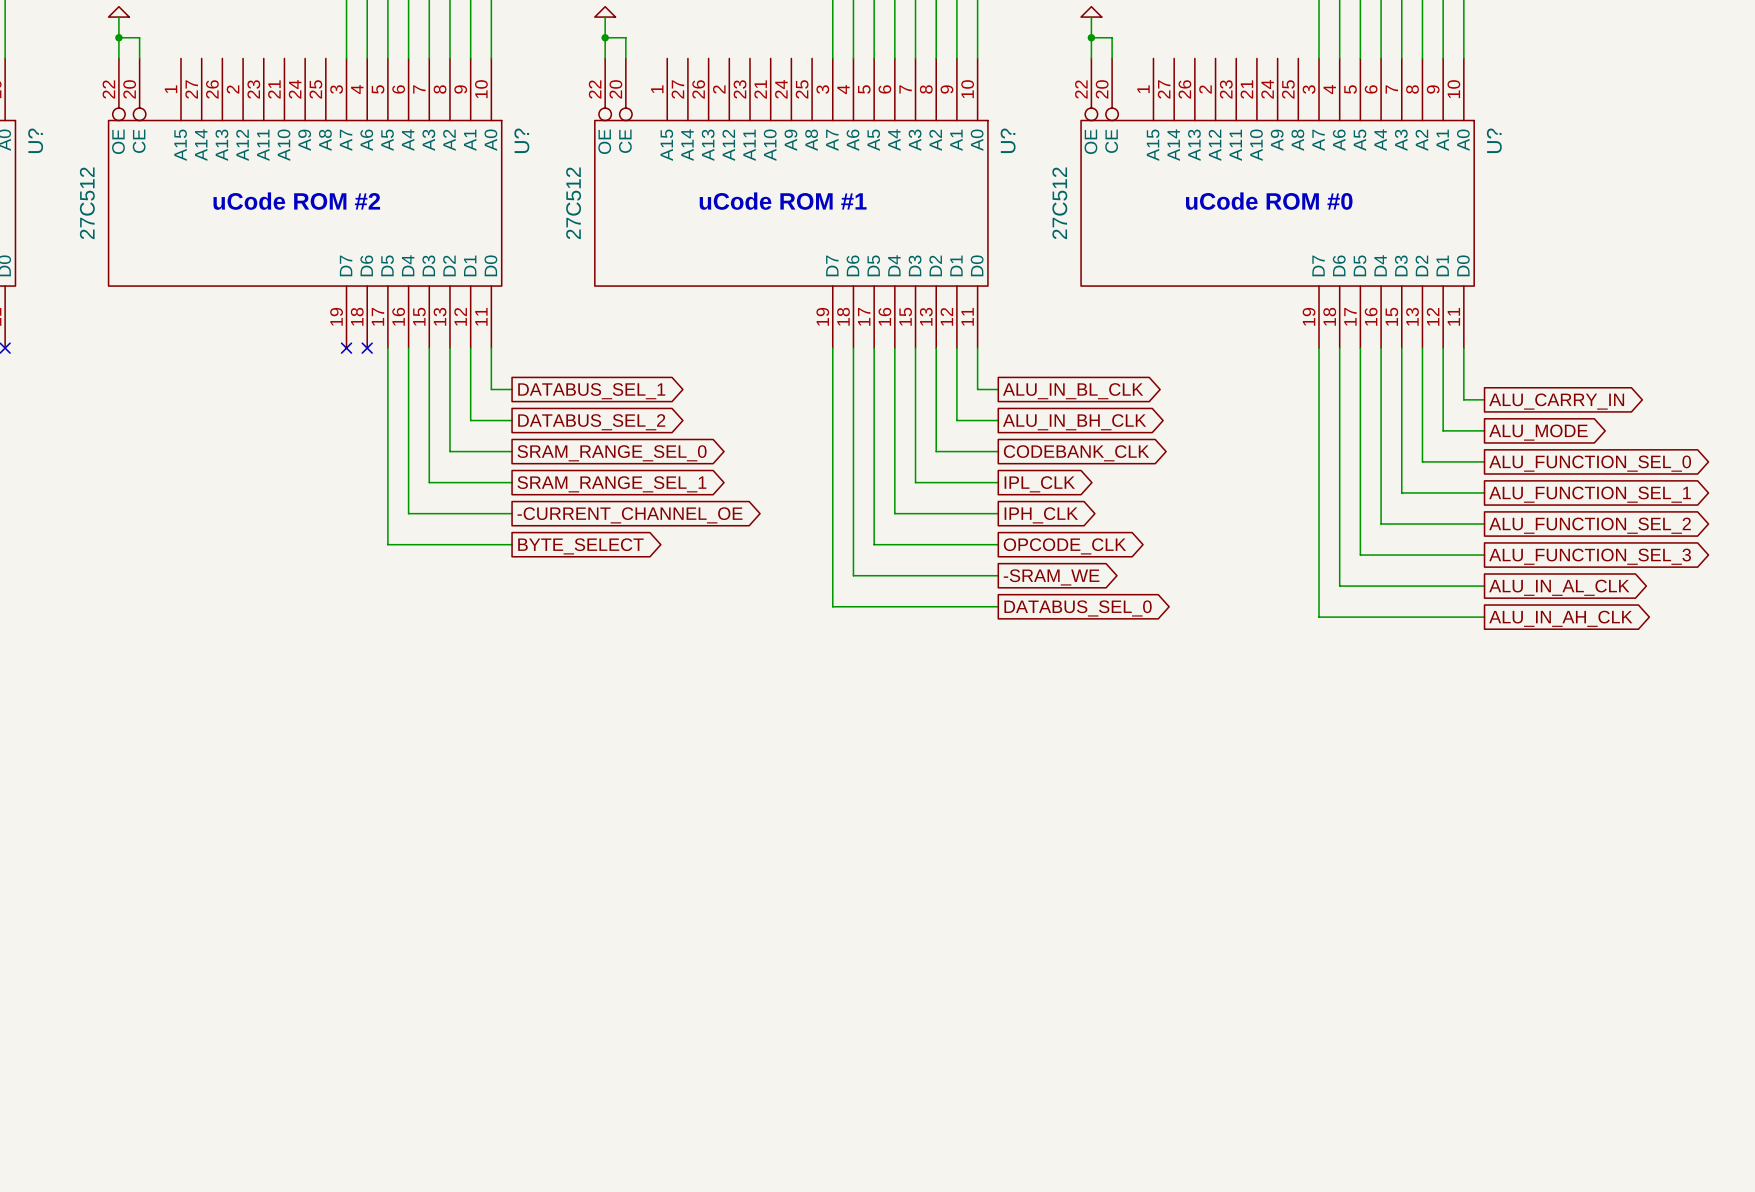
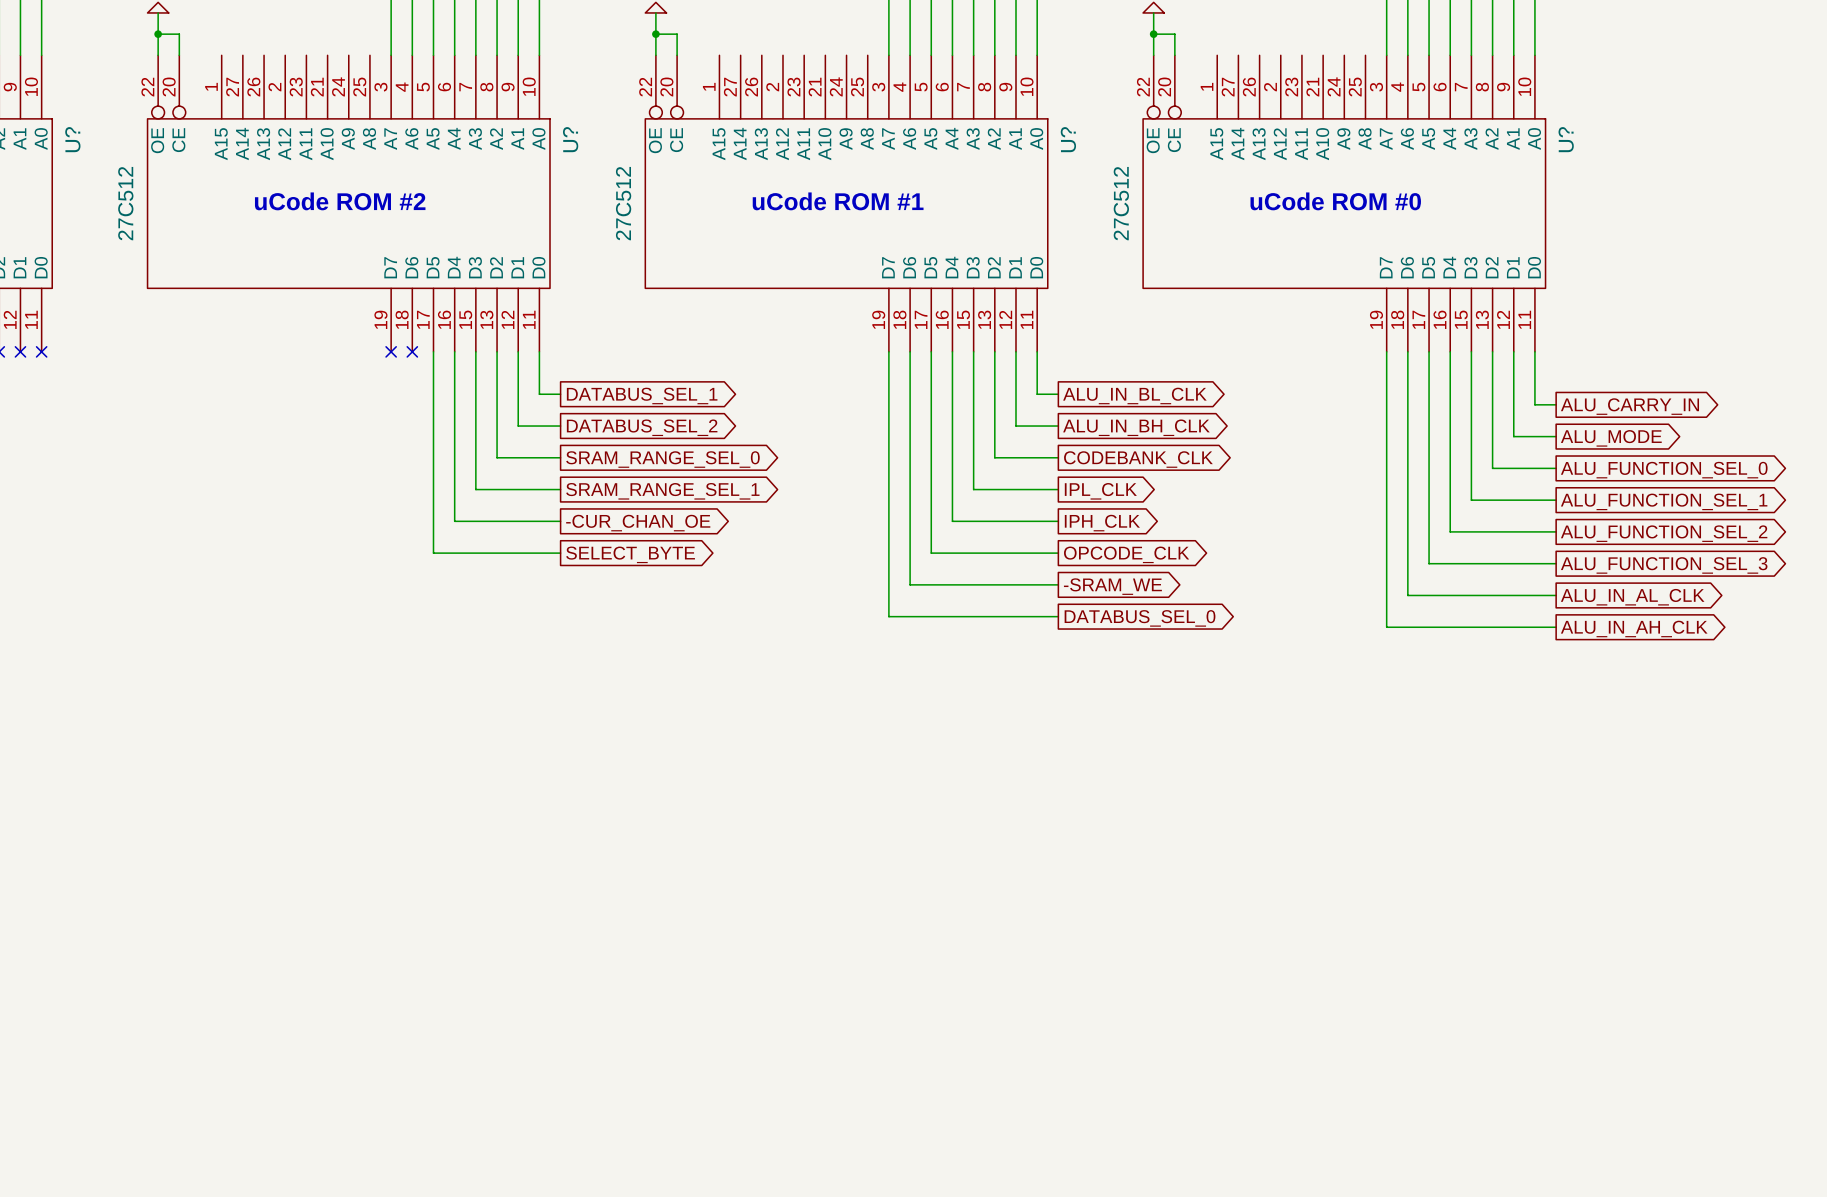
global label: -CURRENT_CHANNEL_OE (630, 515) -> -CUR_CHAN_OE (638, 523)
global label: BYTE_SELECT (580, 546) -> SELECT_BYTE (630, 554)

